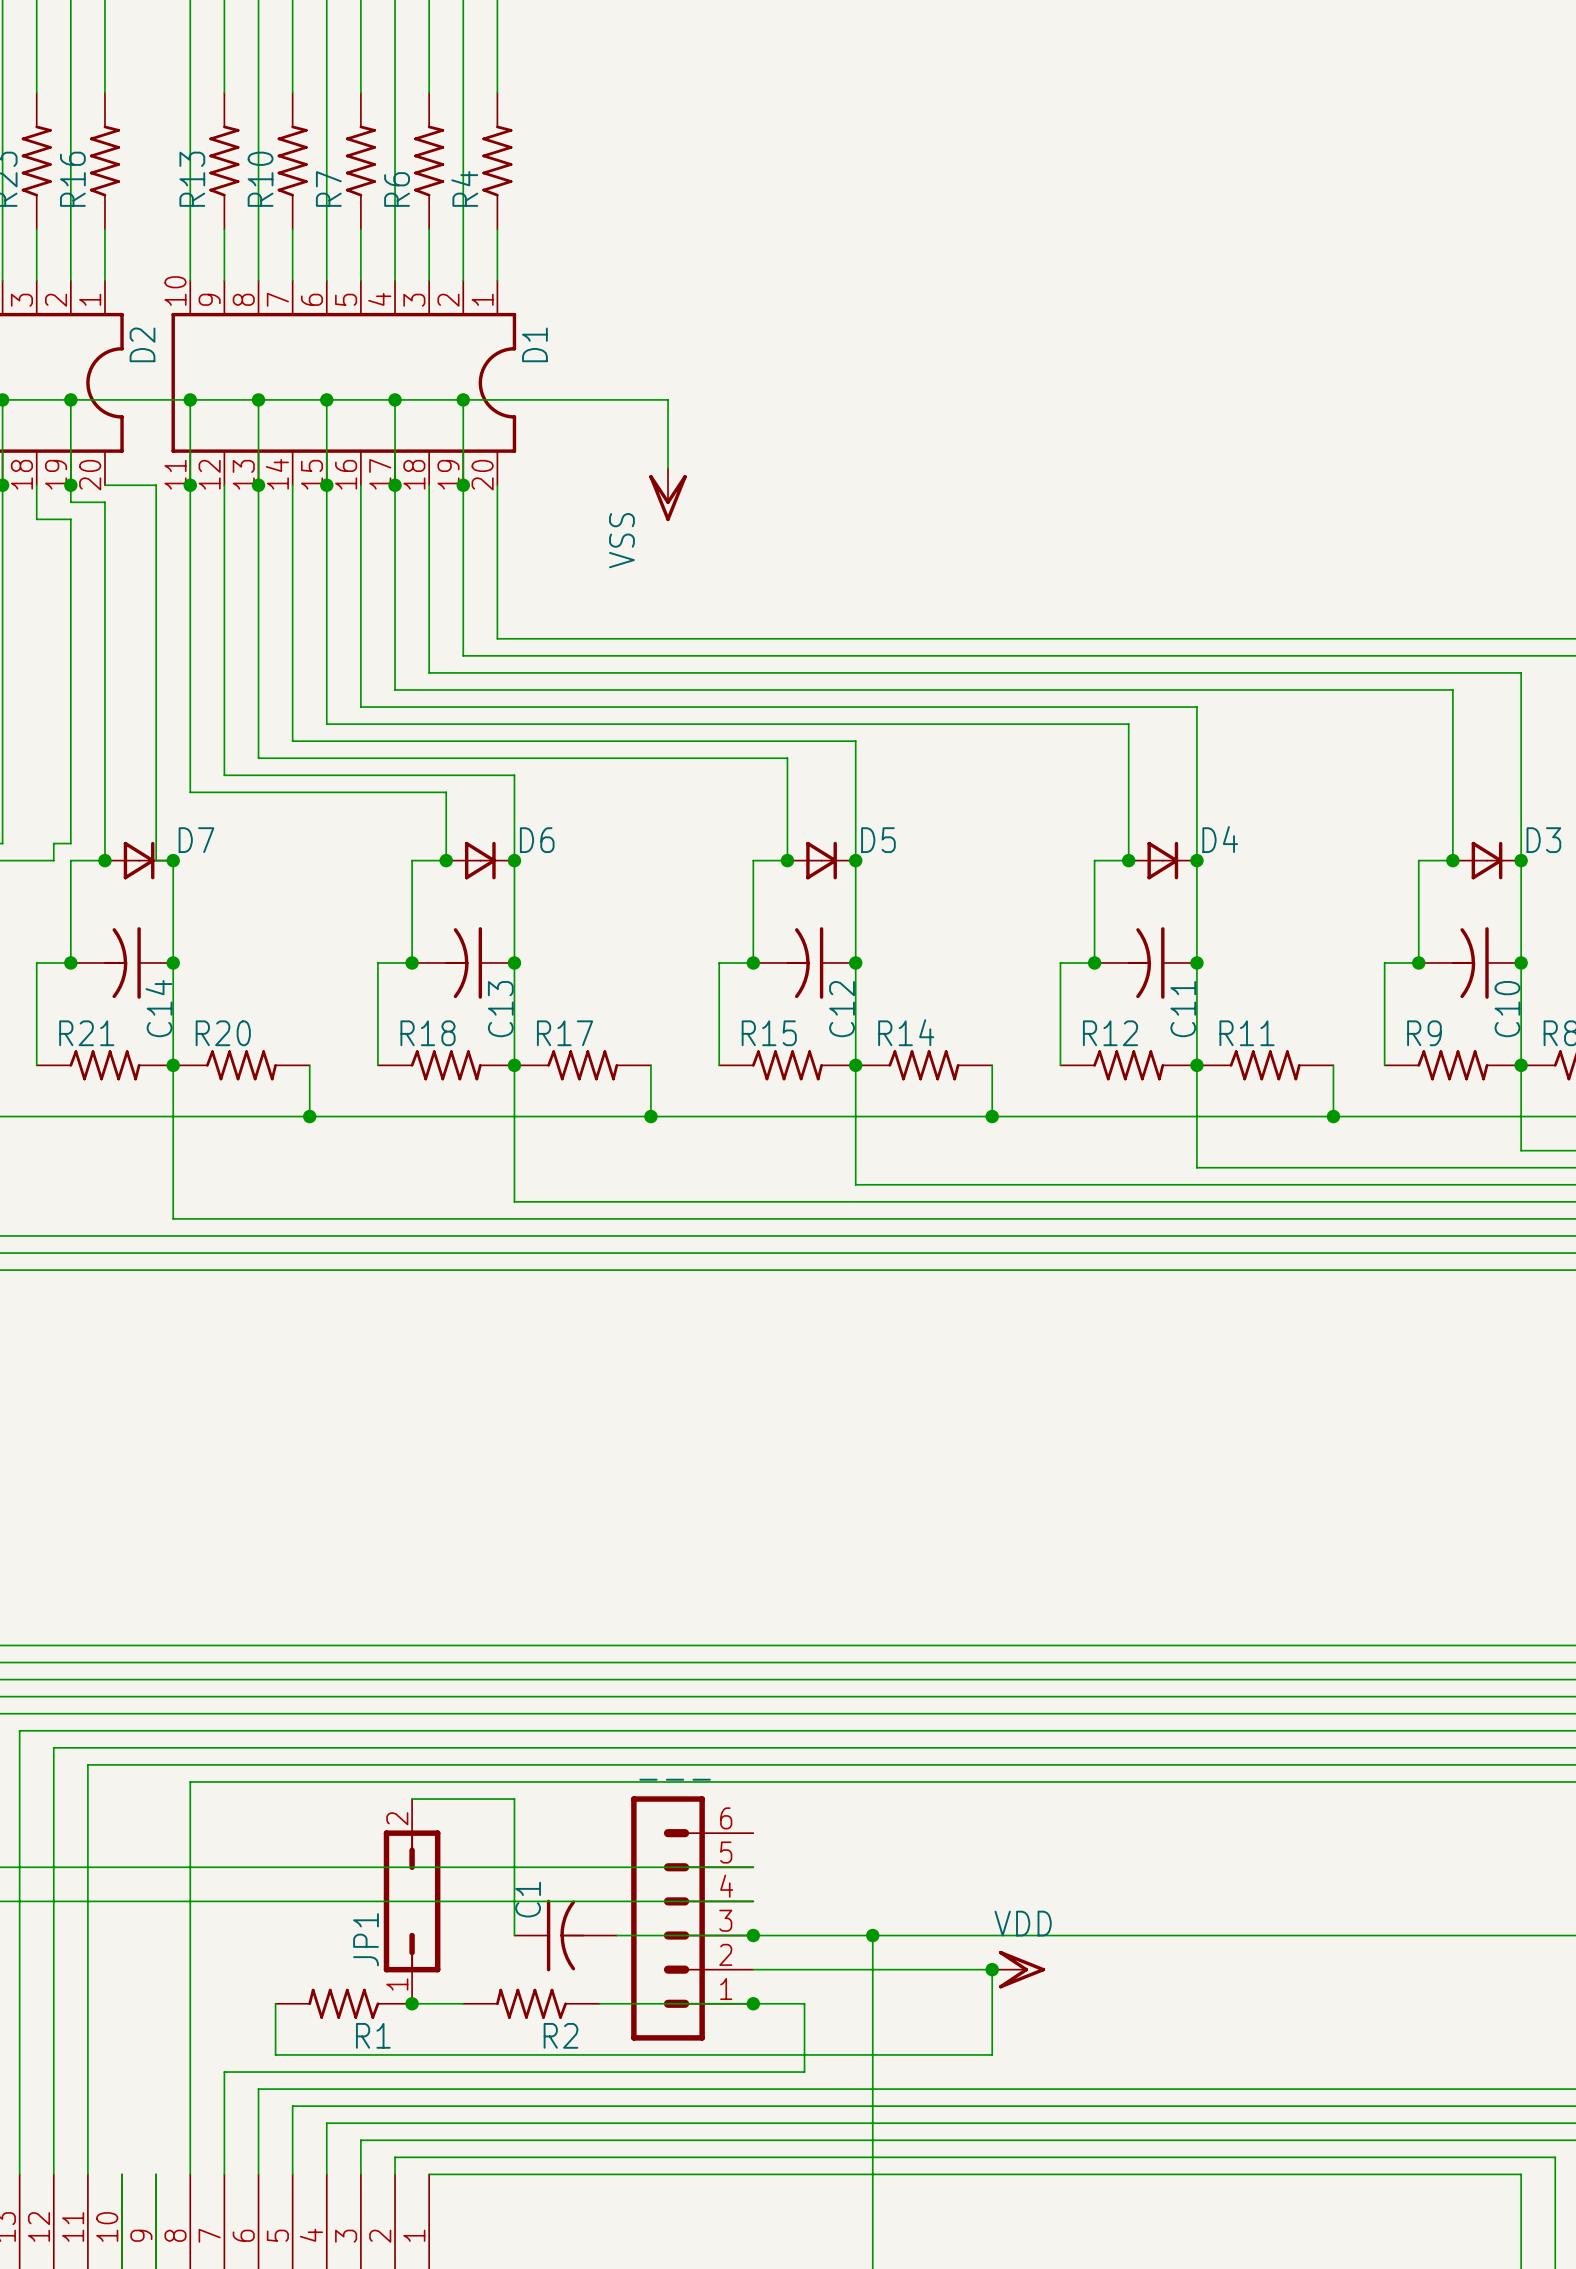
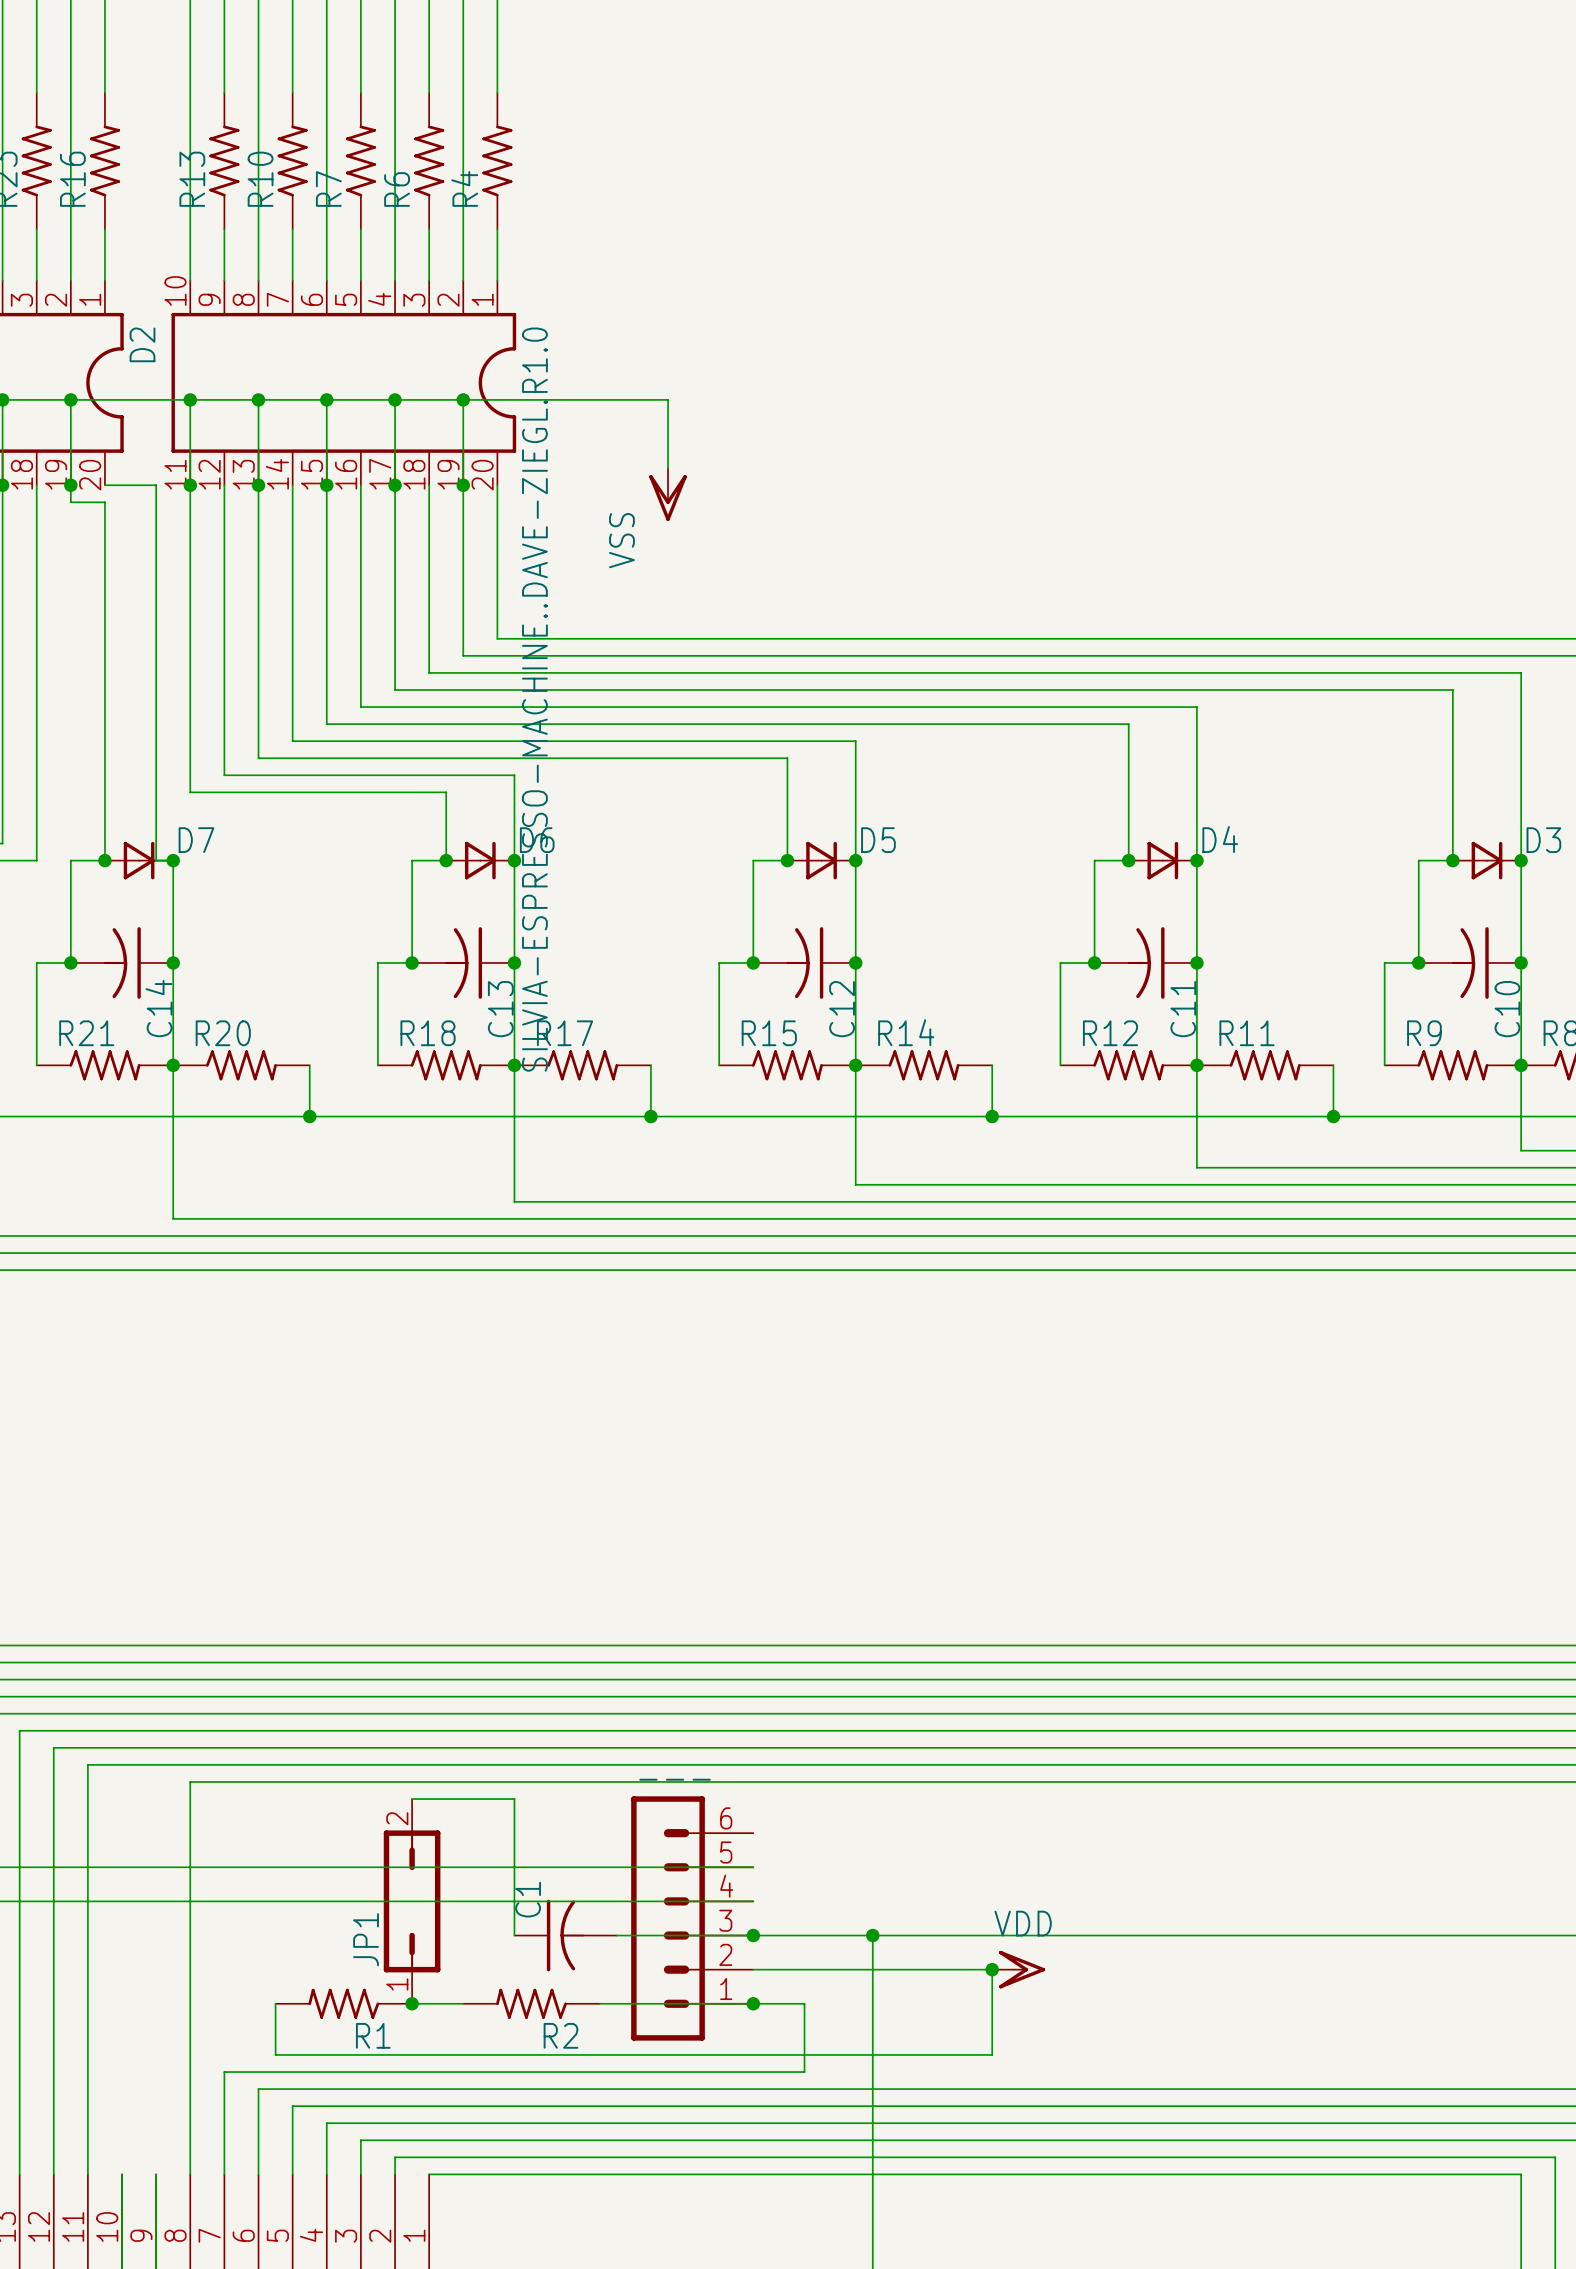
D1 name: D1 (534, 344) -> SILVIA-ESPRESSO-MACHINE..DAVE-ZIEGL.R1.0 (534, 699)
wire: (36, 519) (70, 519) (70, 843) (53, 843) (53, 860) (36, 860) -> (36, 519) (36, 860)

